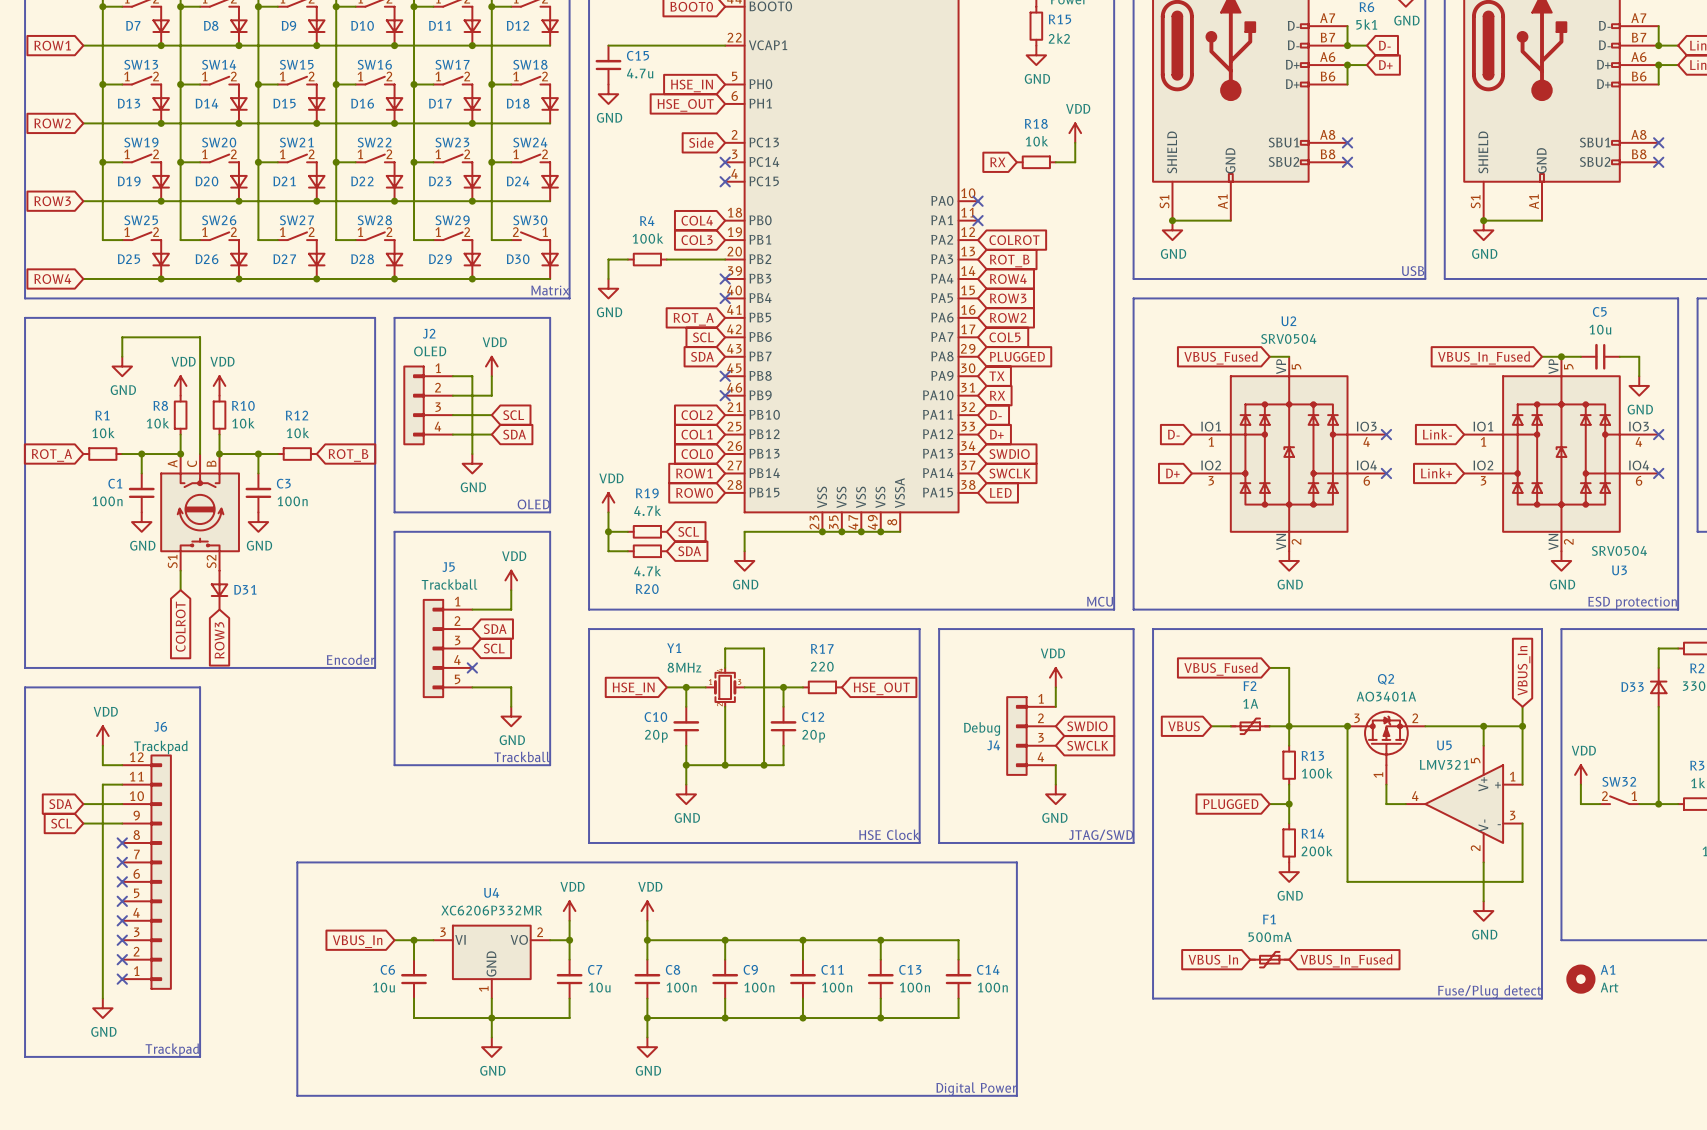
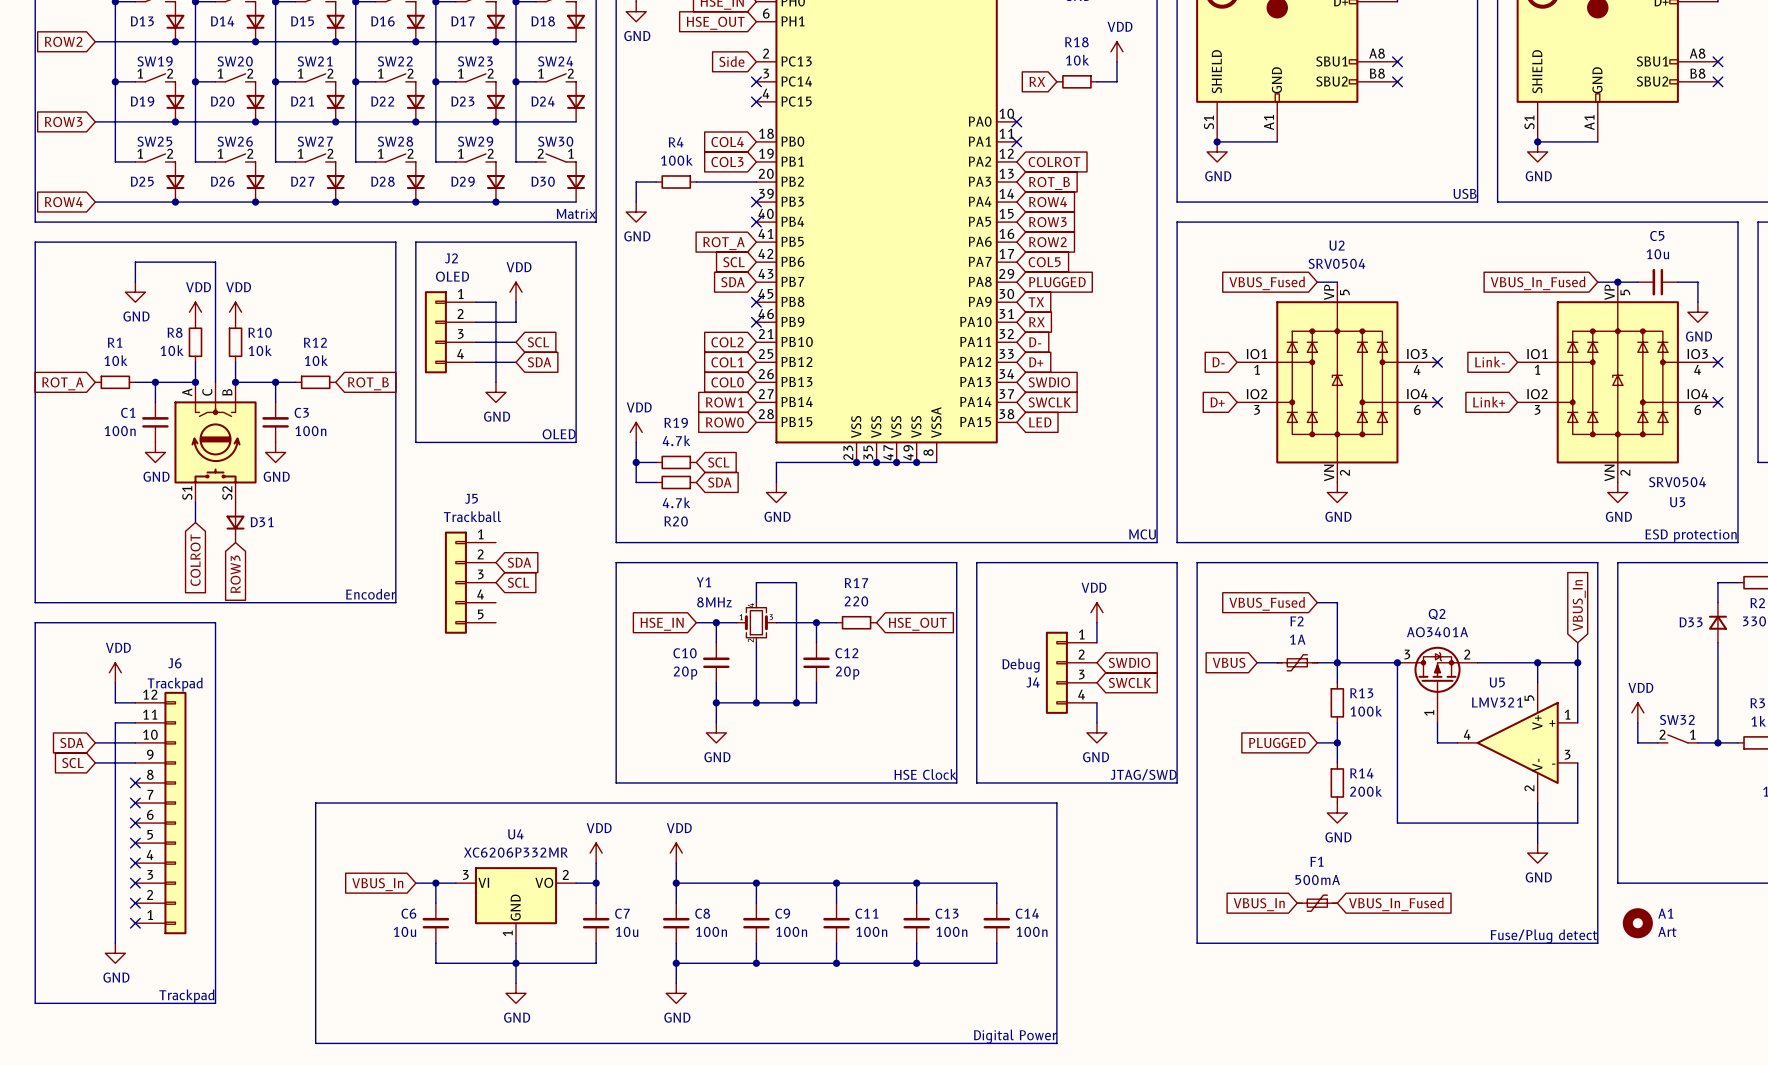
line: (394, 531) (550, 531) (550, 765) (394, 765) (394, 531) -> none
power symbol: VDD (511, 580) -> none
wire: (511, 590) (511, 609) (472, 609) -> none
no-connect mark: (472, 667) -> none
wire: (472, 687) (511, 687) (511, 706) -> none
power symbol: GND (511, 716) -> none
text: Trackball (522, 756) -> none

